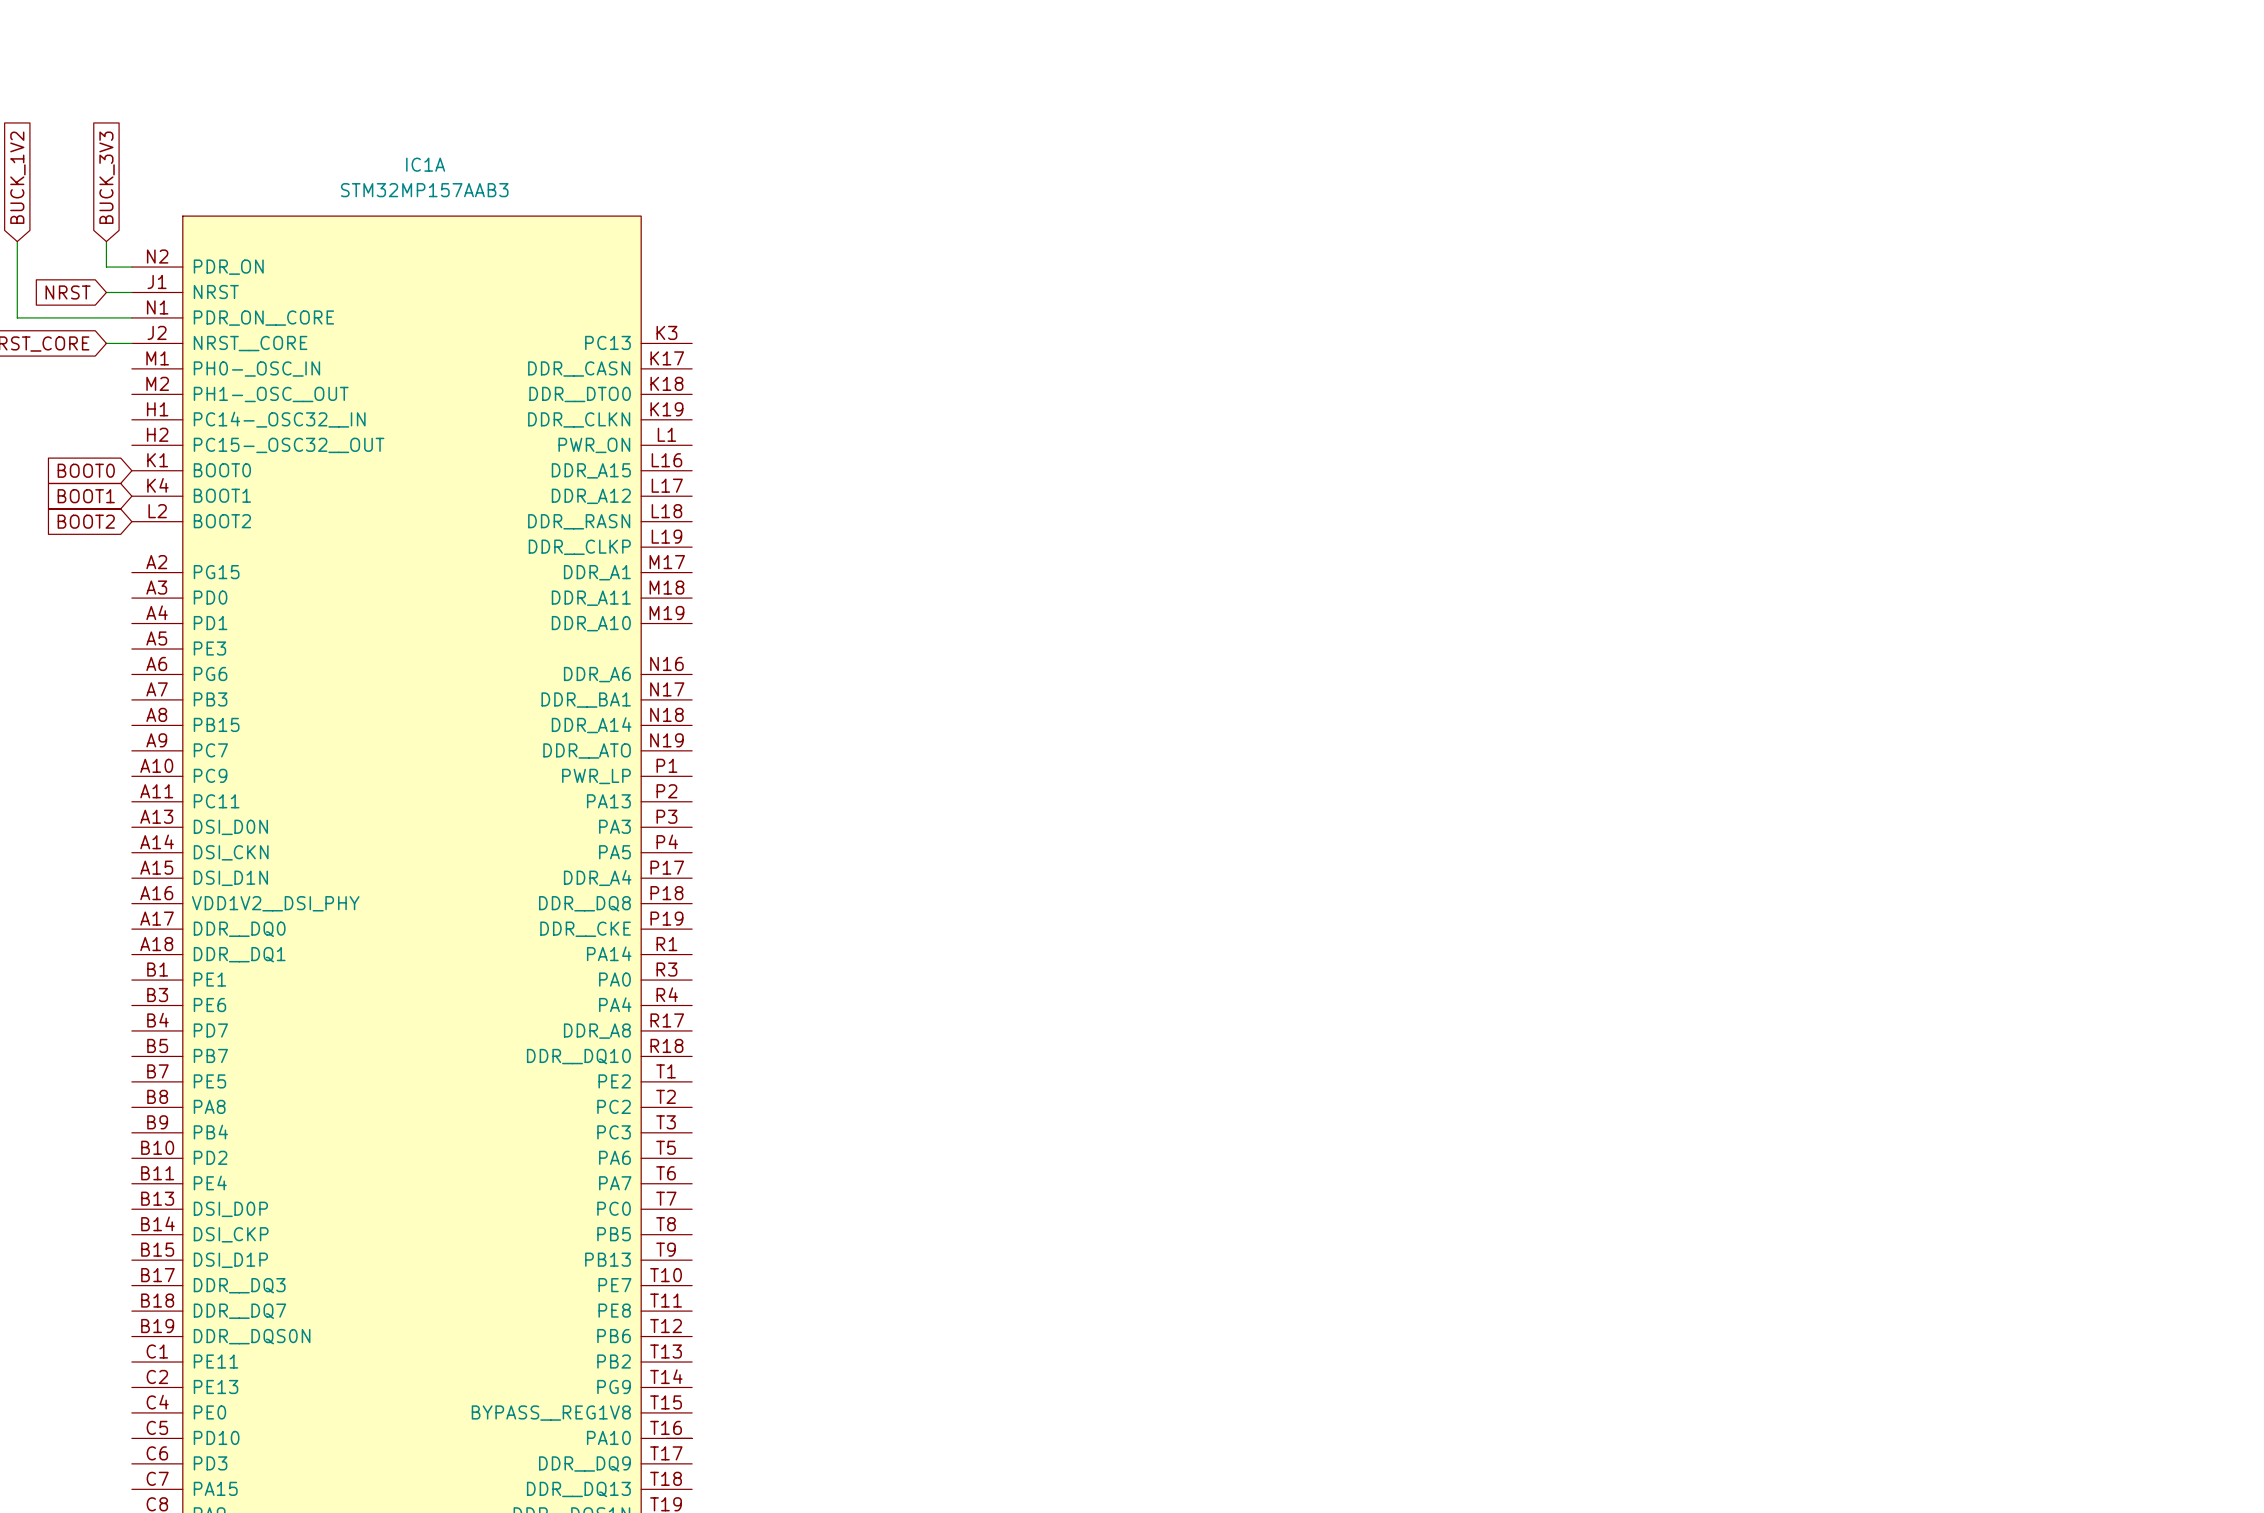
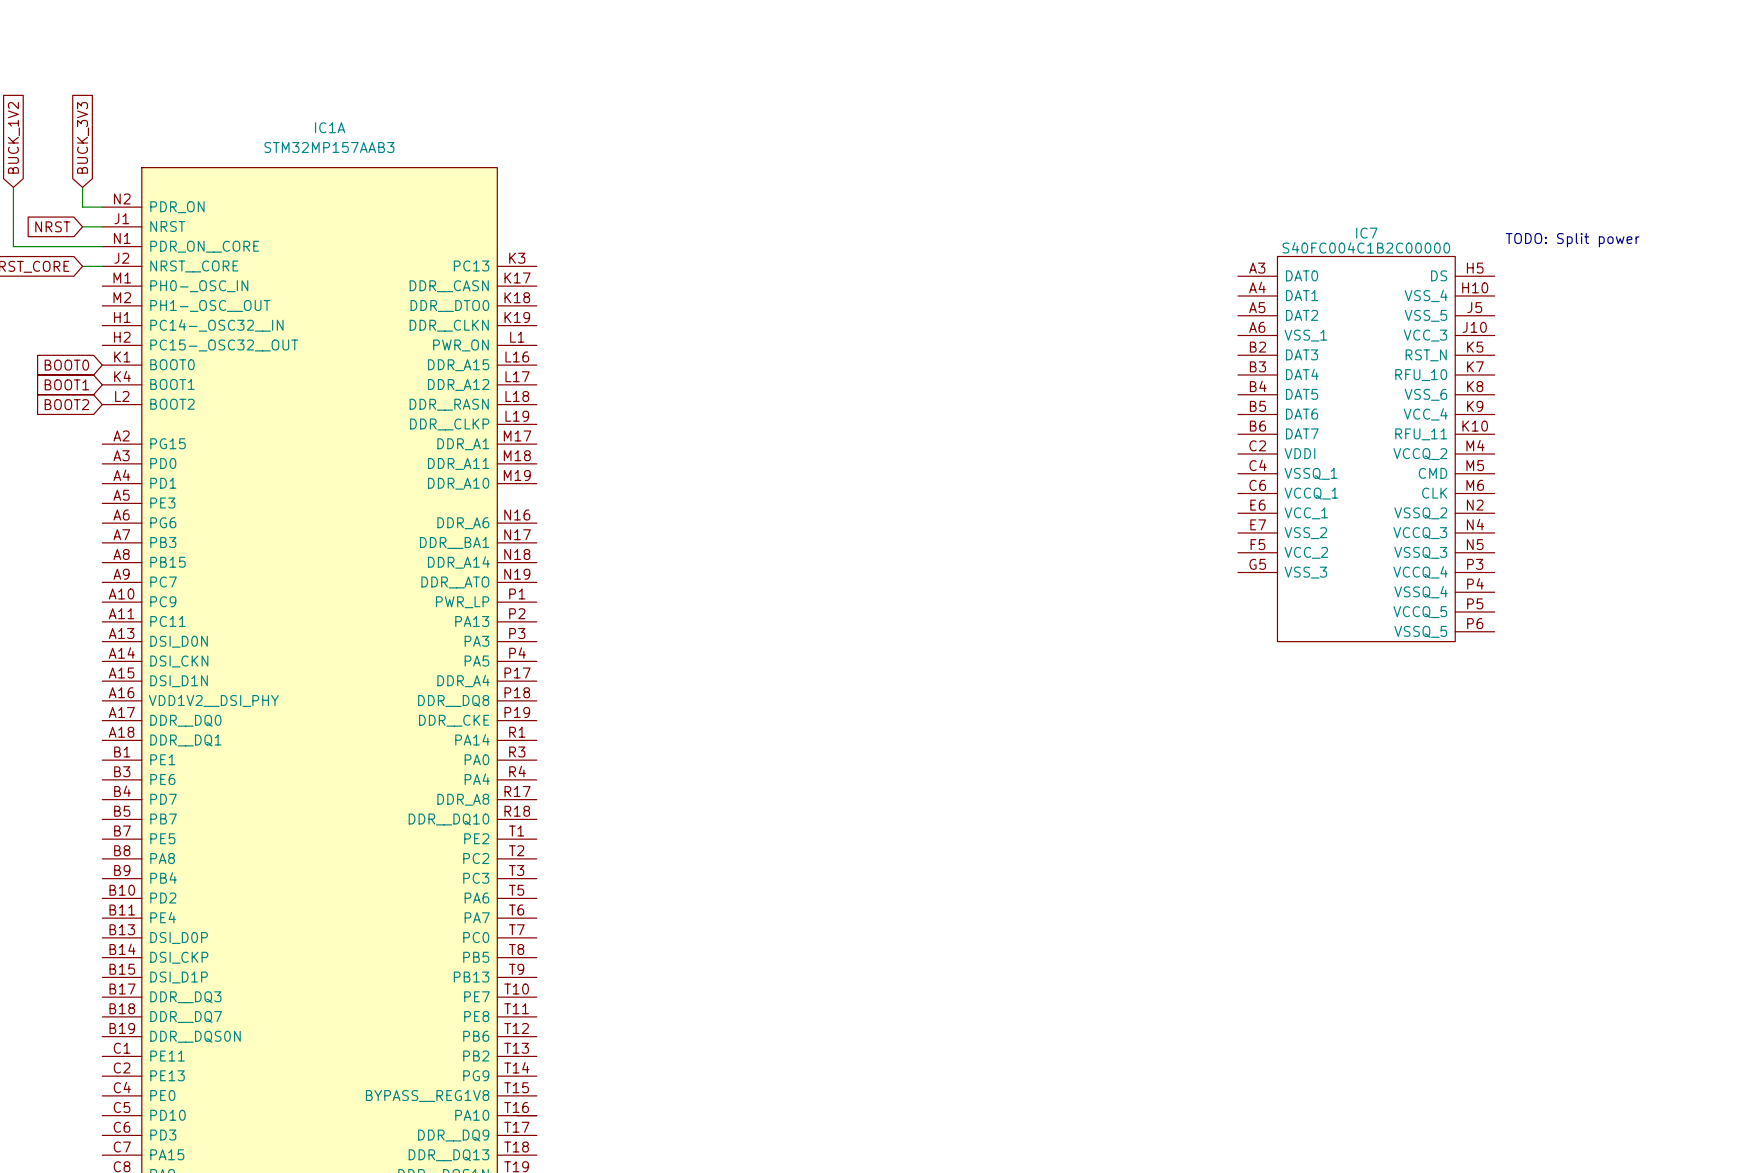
text: none -> TODO: Split power (1572, 240)
IC7: none -> S40FC004C1B2C00000 (1366, 449)

